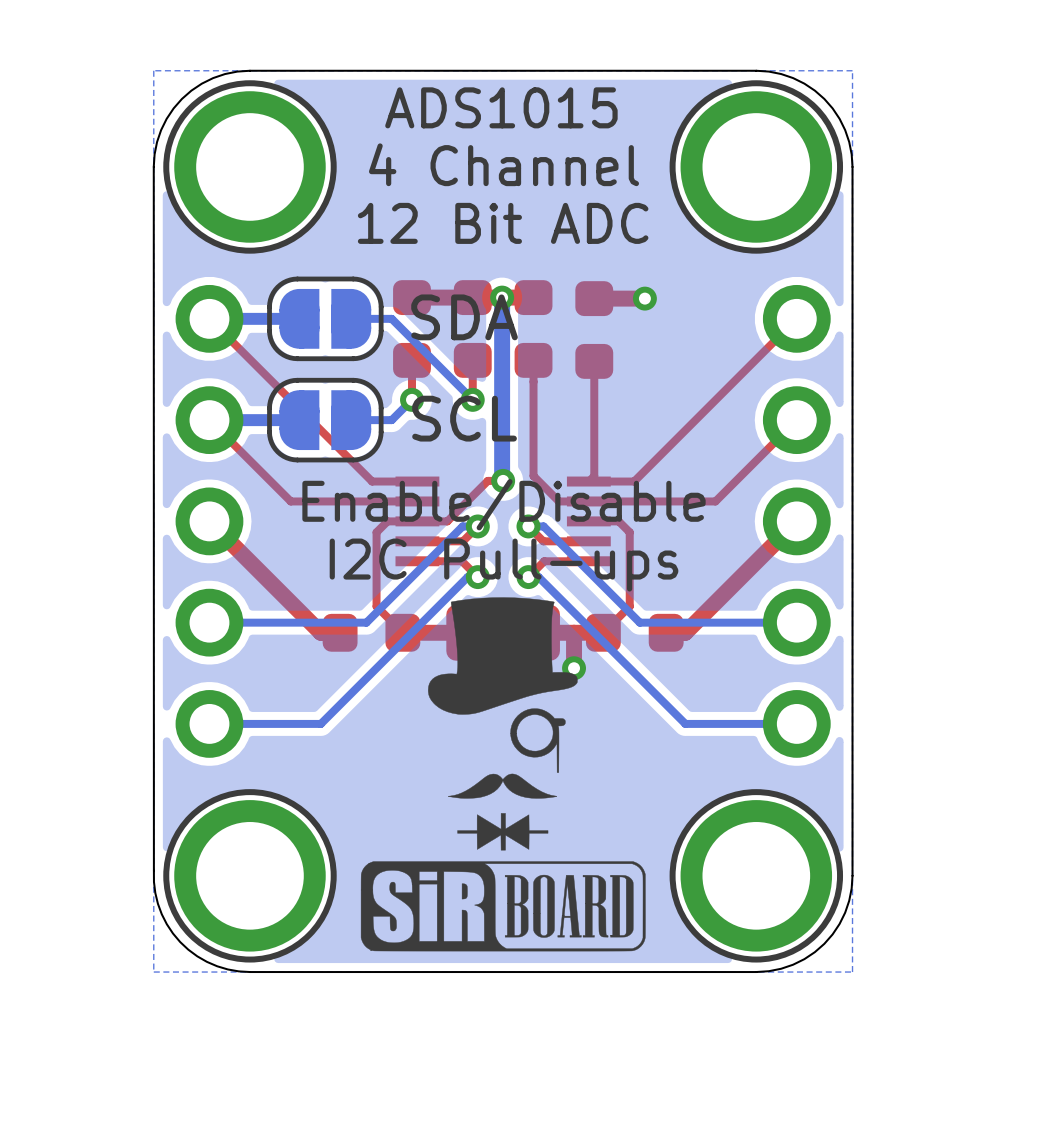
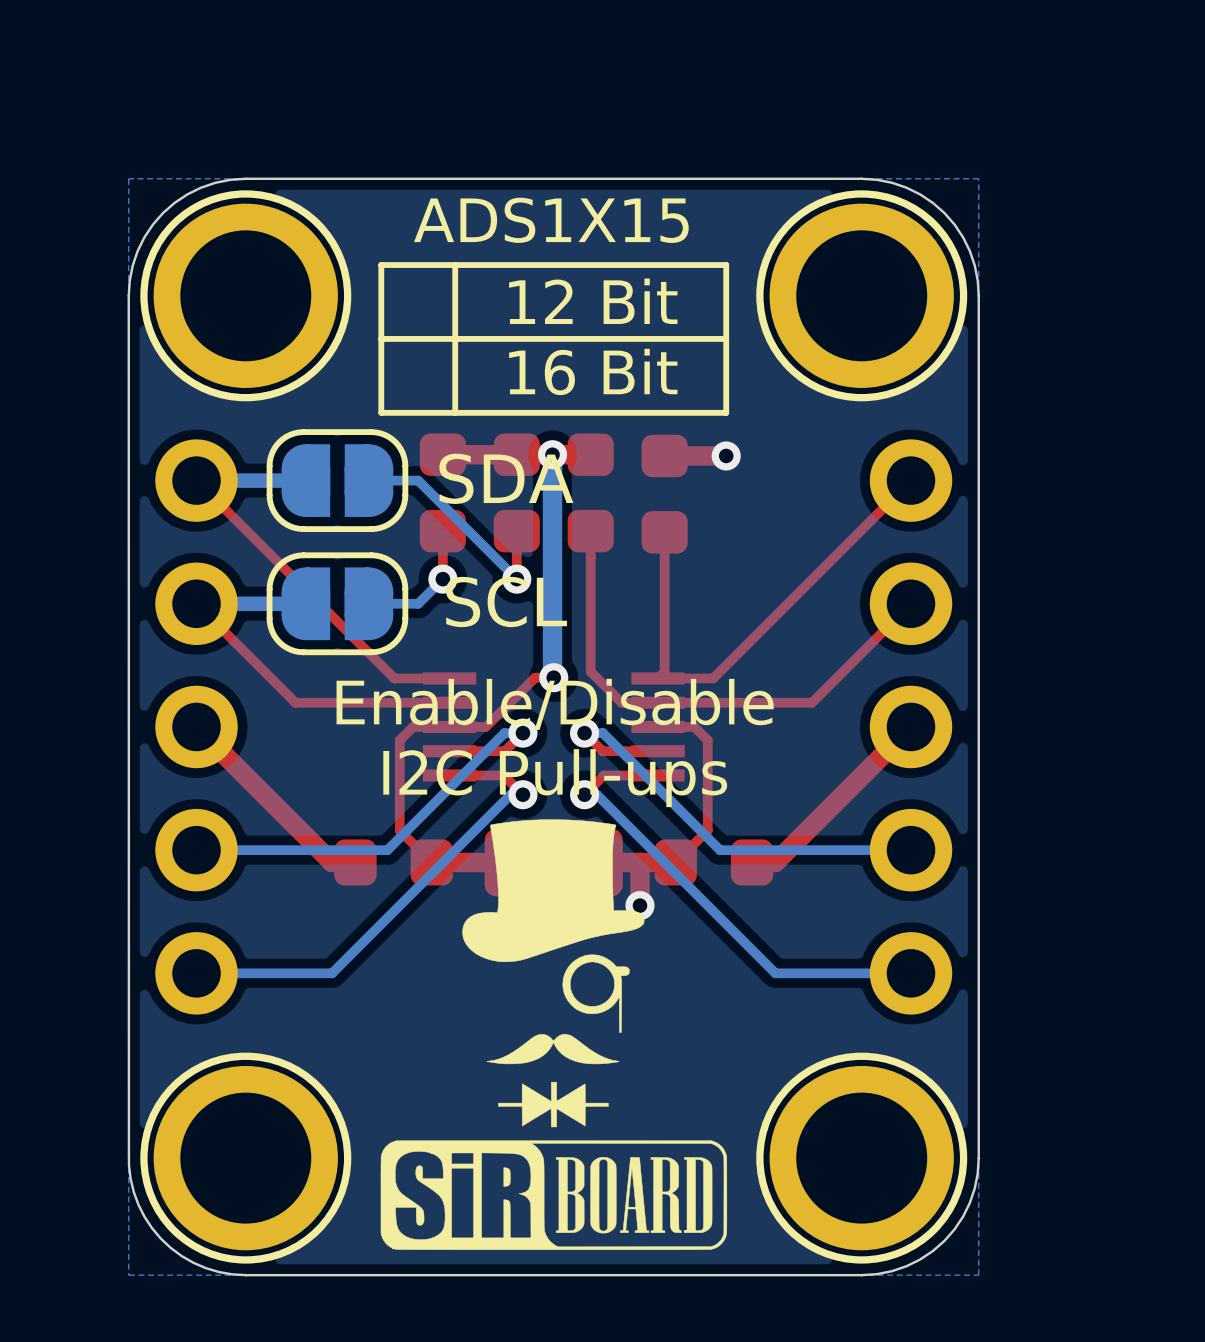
text: ADS1015 (501, 107) -> ADS1X15 (551, 220)
line: none -> (455, 265) (455, 412)
line: none -> (726, 265) (726, 412) (381, 412) (381, 265) (726, 265)
text: 4 Channel (503, 164) -> none
text: none -> 12 Bit (593, 301)
line: none -> (726, 338) (381, 338)
text: 12 Bit ADC (503, 223) -> none
text: none -> 16 Bit (593, 371)

